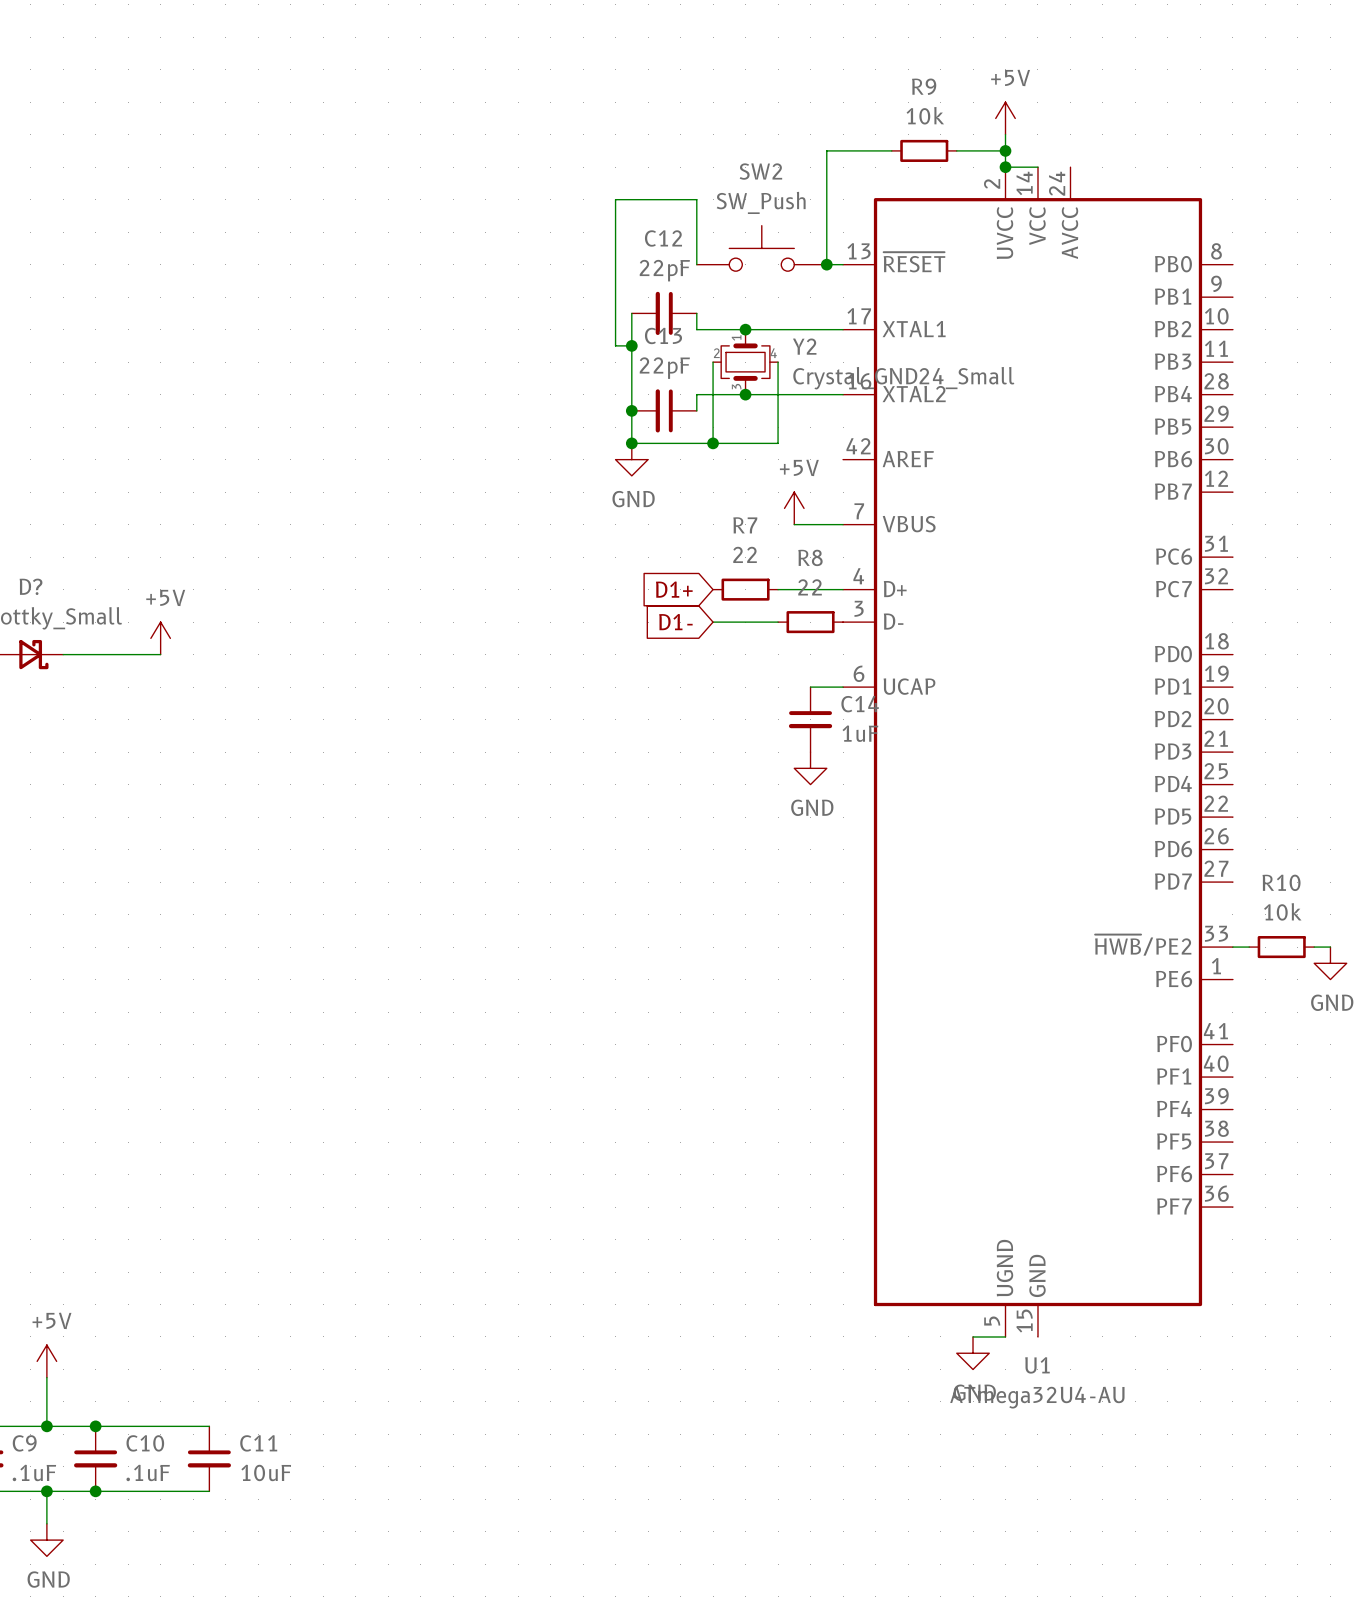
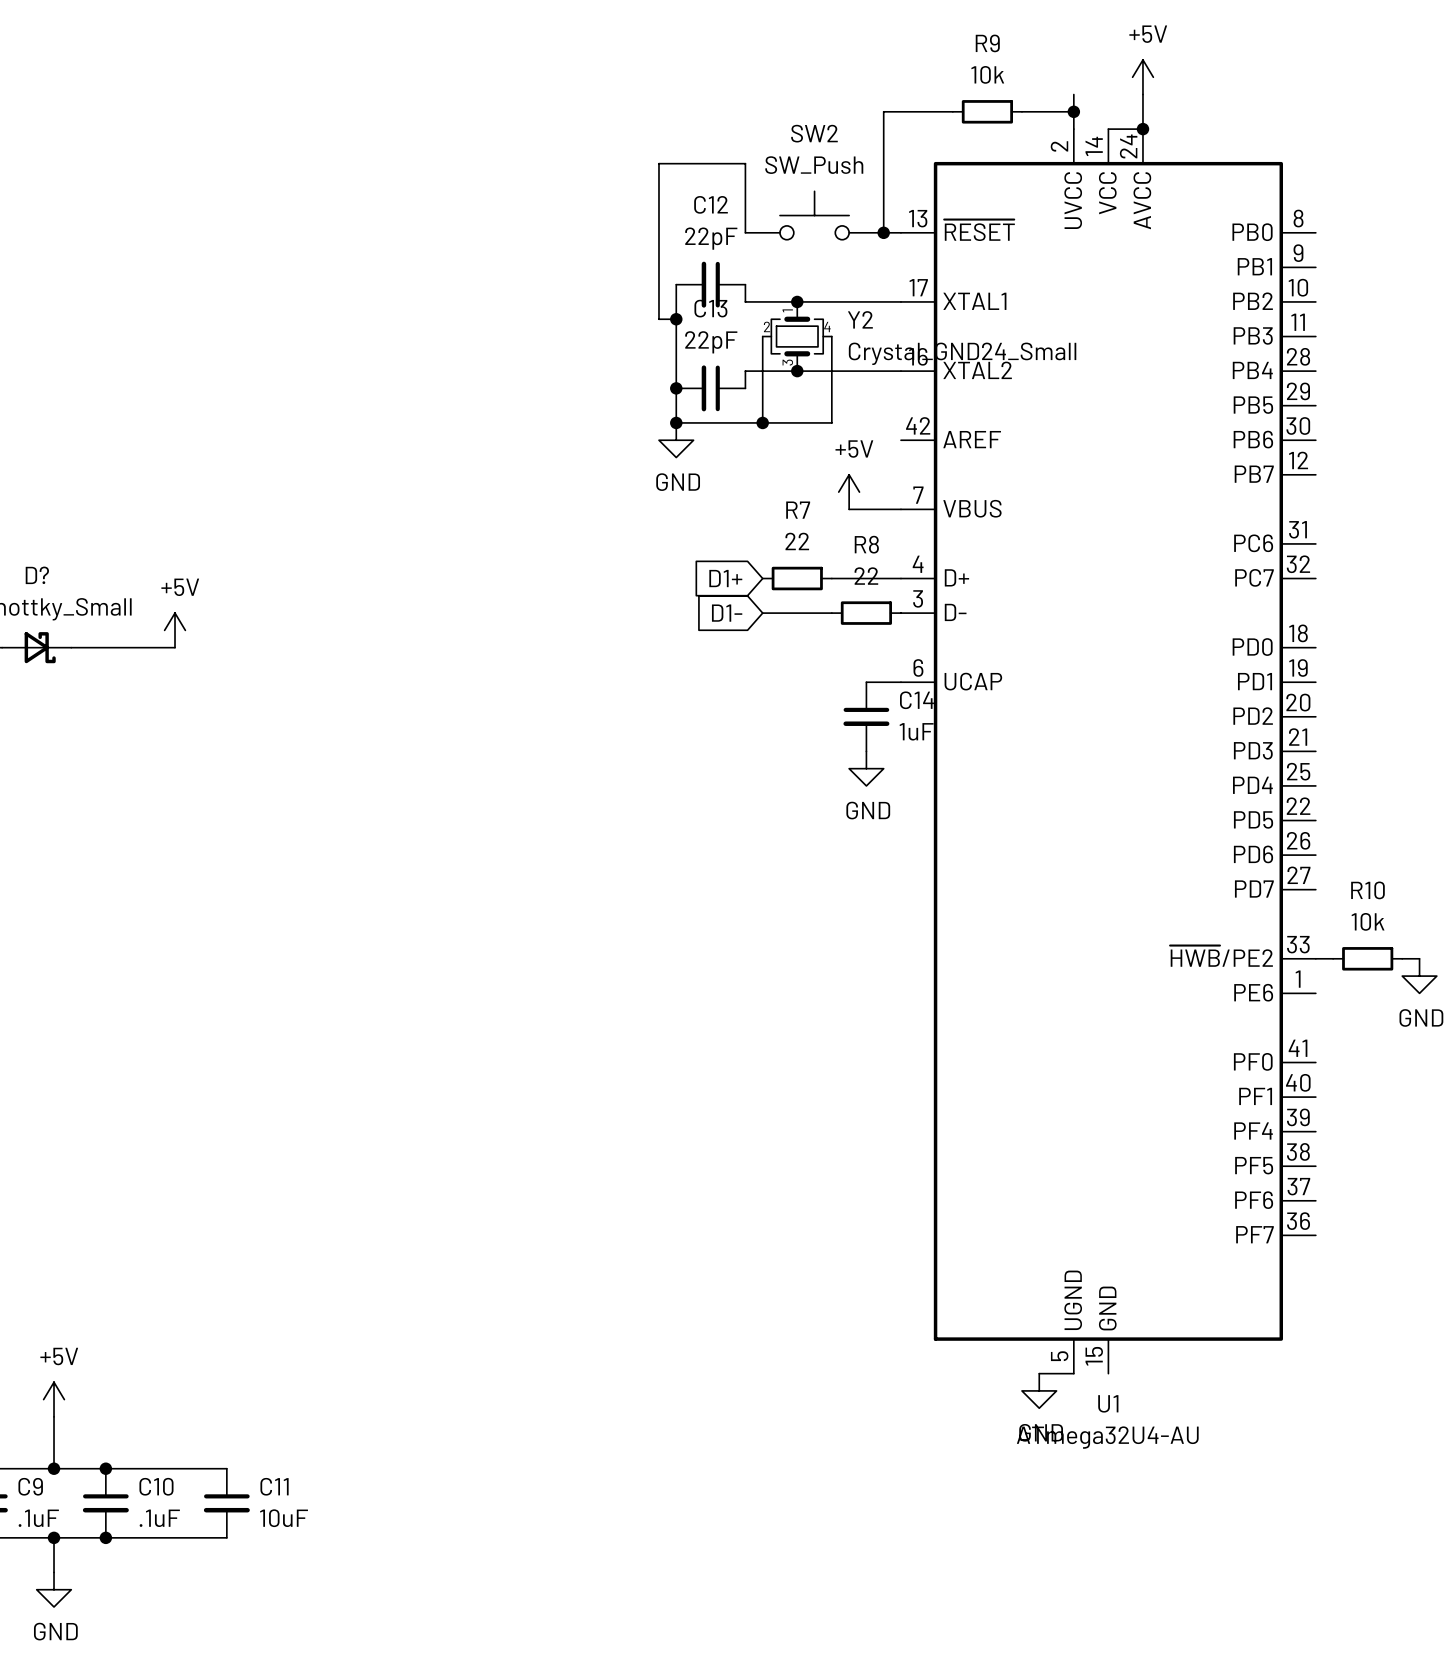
power symbol position: +5V (1005, 118) -> +5V (1142, 77)
wire: (1005, 167) (1037, 167) -> (1142, 94) (1142, 129) (1108, 129)
junction position: (1005, 167) -> (1142, 129)

